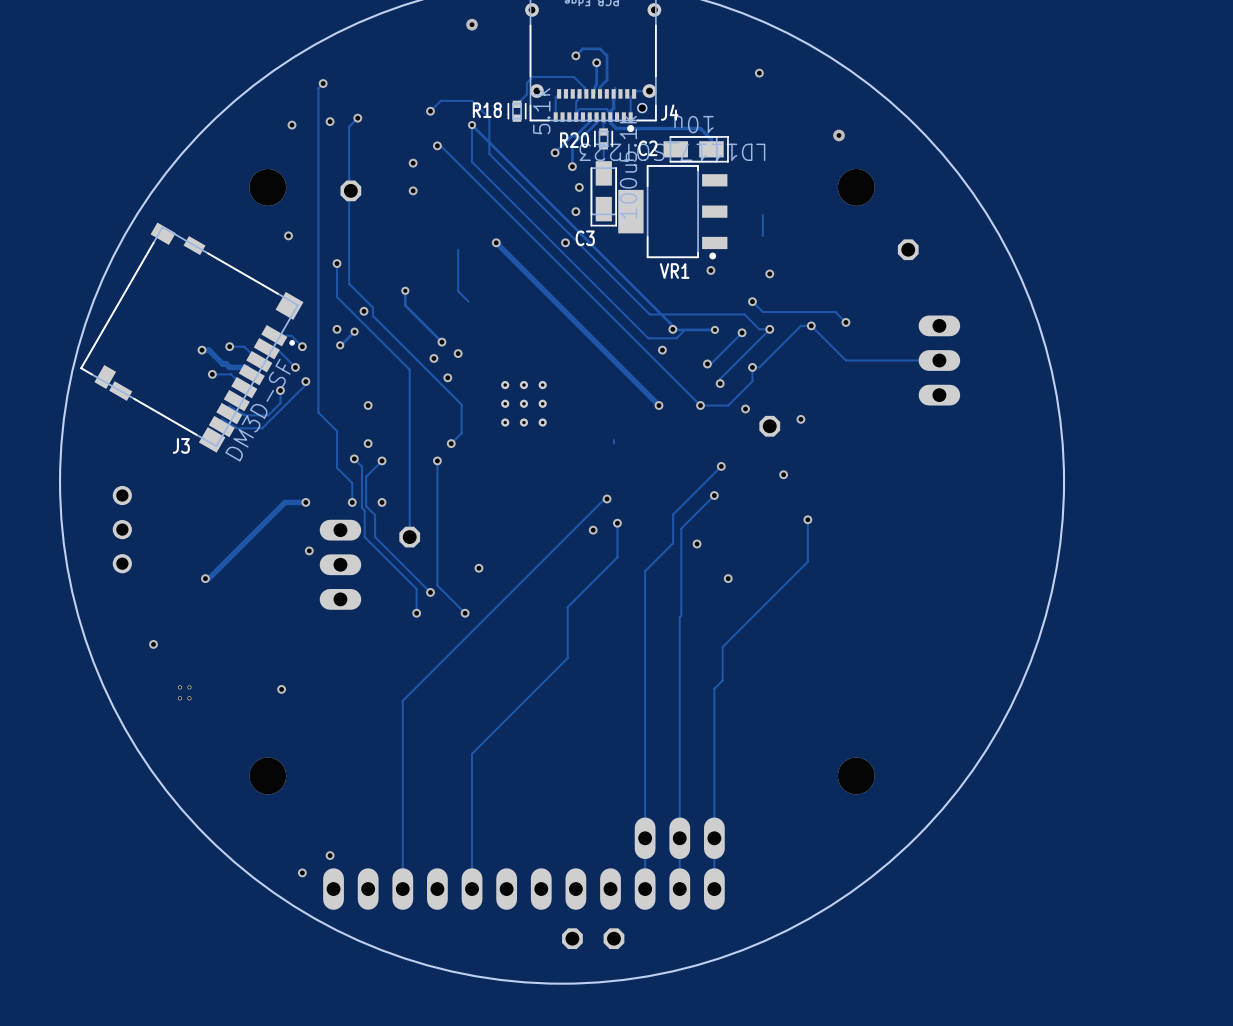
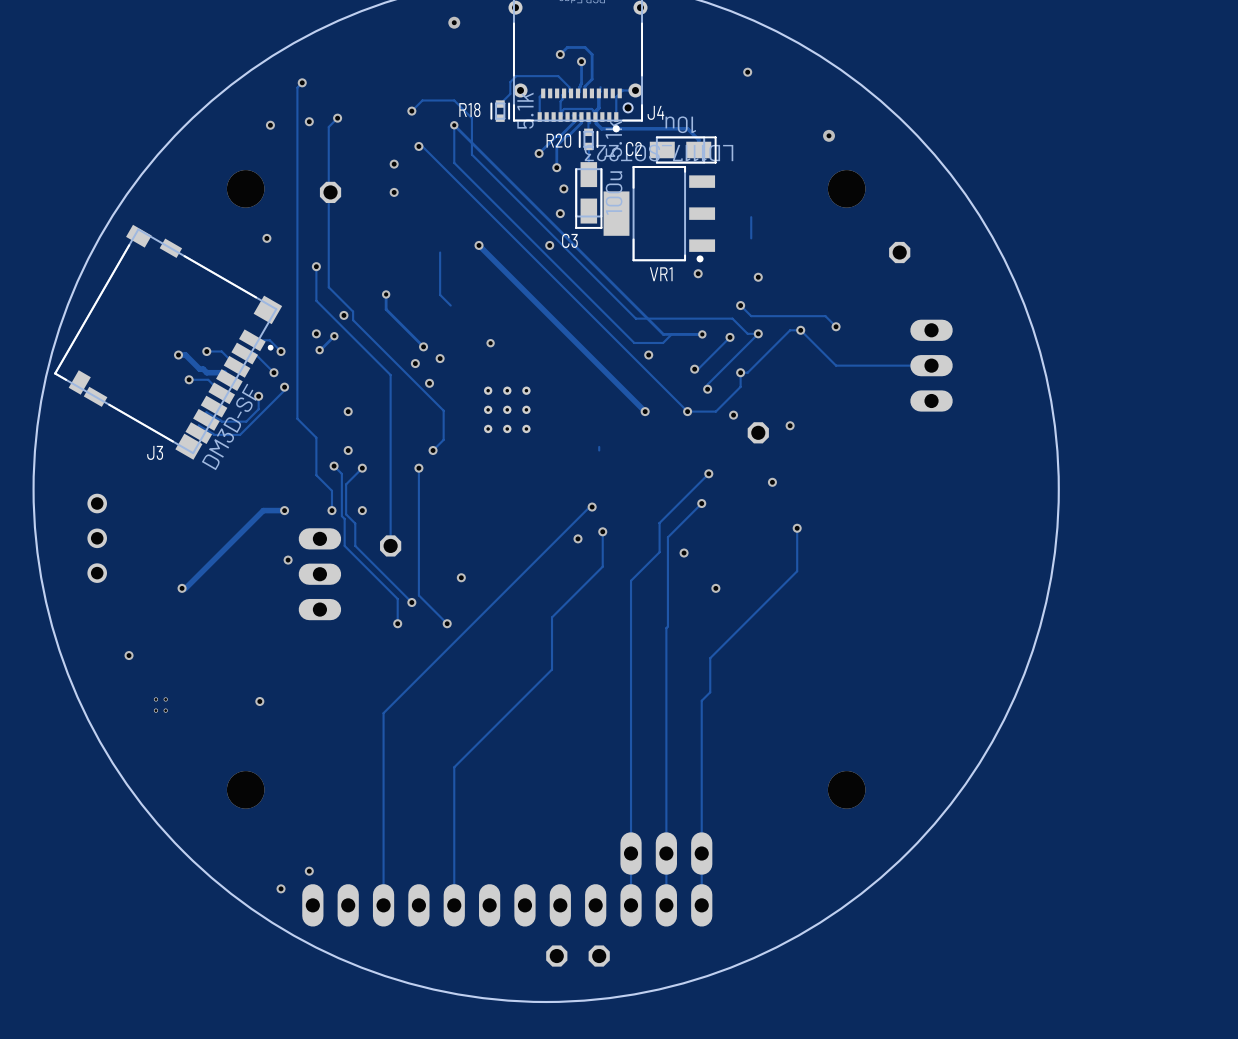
via: (672, 329) -> none
via: none -> (490, 343)

